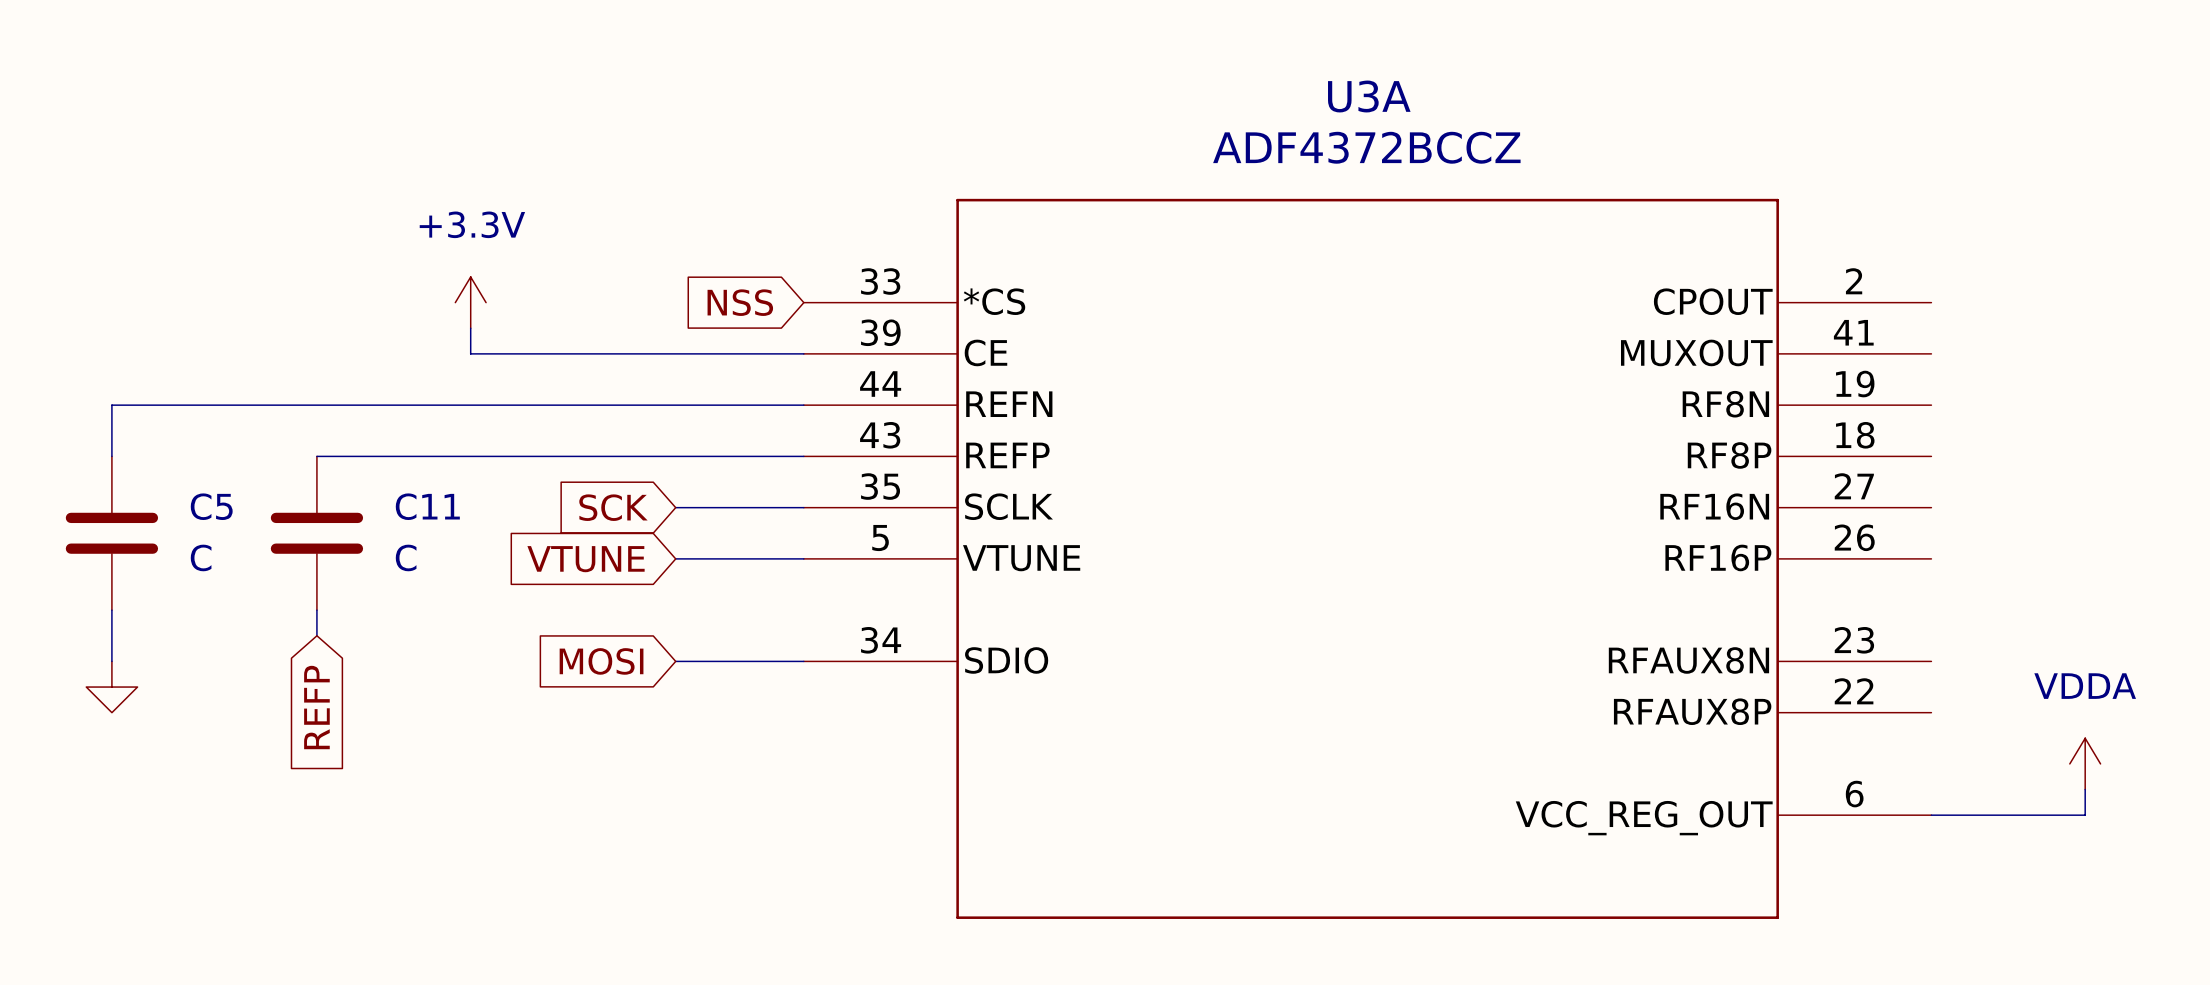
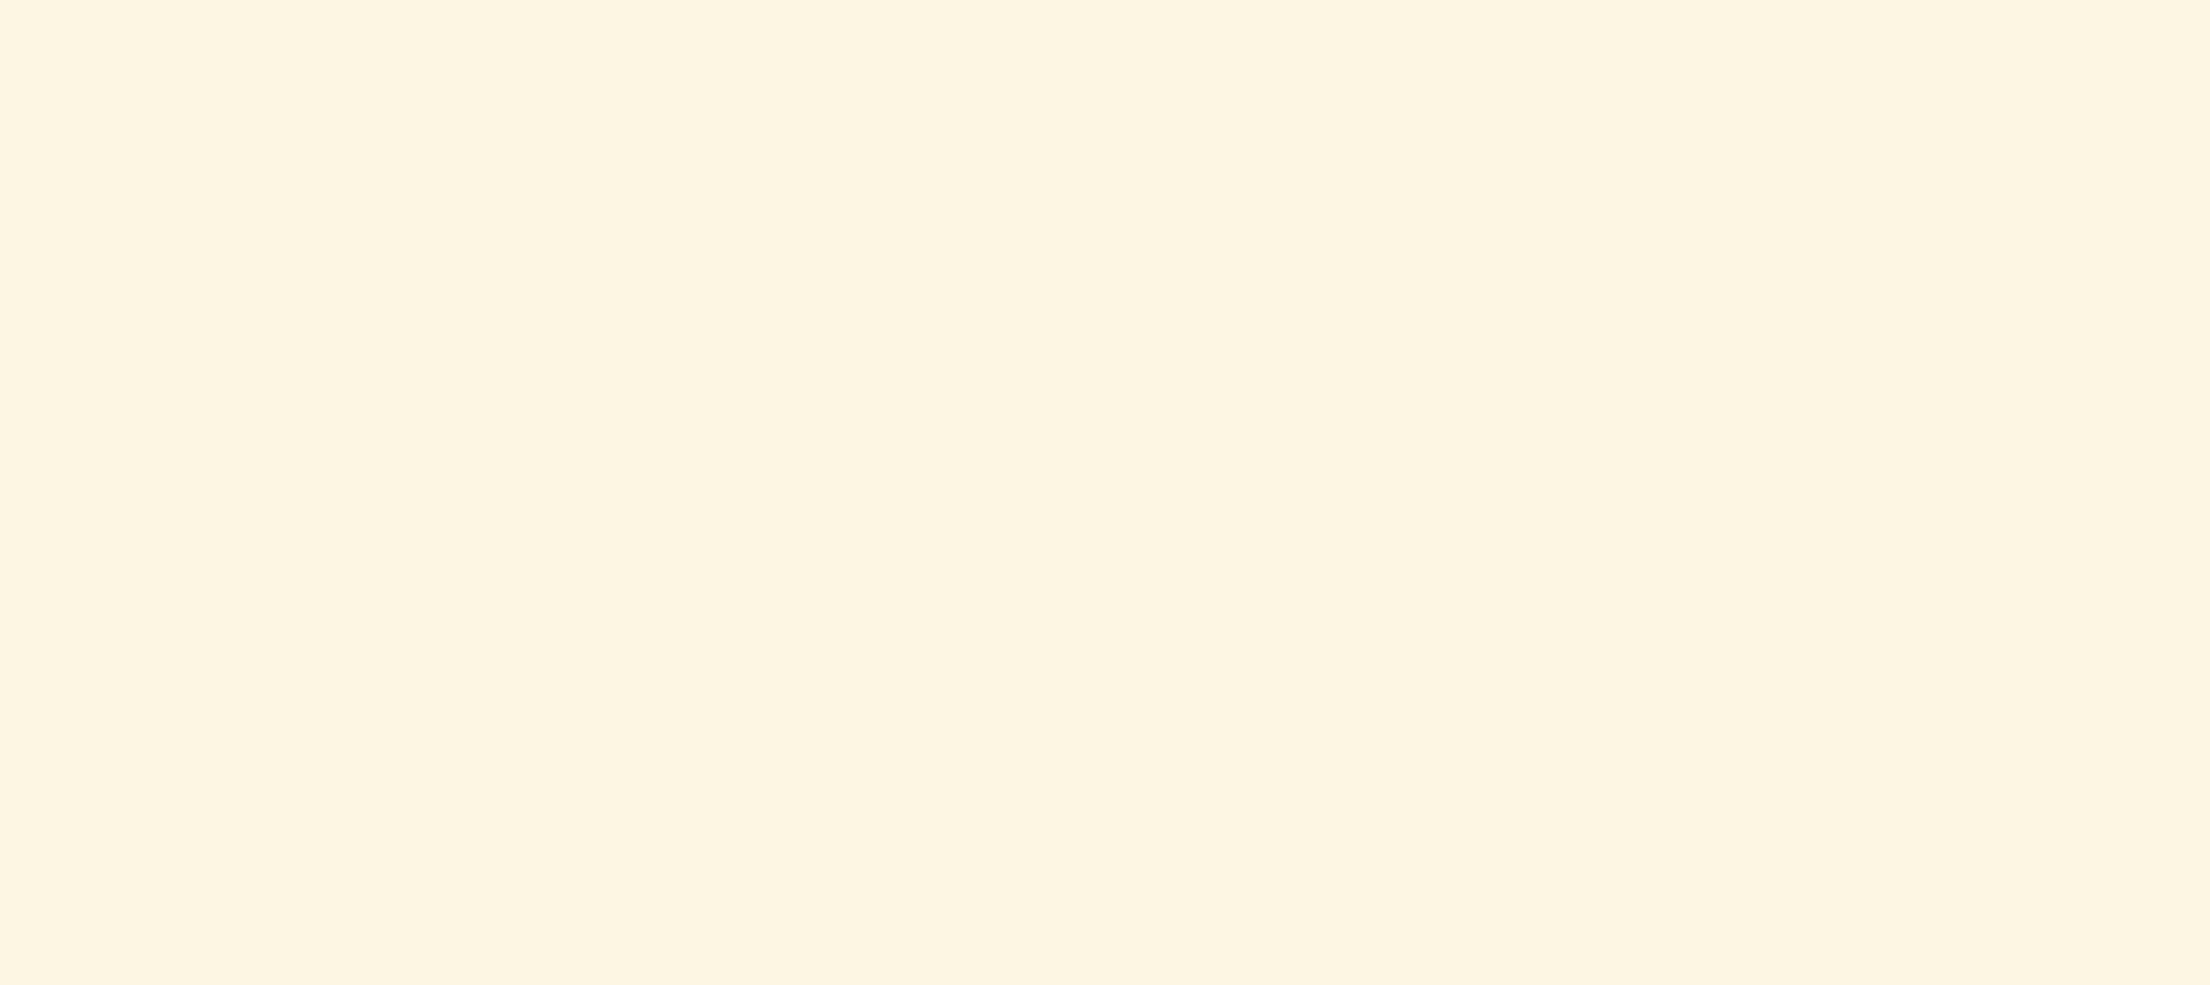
power symbol: +3.3V (470, 302) -> none
global label: NSS (740, 302) -> none
wire: (470, 328) (470, 353) (803, 353) -> none
wire: (803, 405) (111, 405) (111, 456) -> none
wire: (316, 456) (803, 456) -> none
global label: SCK (613, 507) -> none
wire: (675, 507) (803, 507) -> none
C5: C (111, 533) -> none
C11: C (316, 533) -> none
wire: (675, 558) (803, 558) -> none
U3A: ADF4372BCCZ (1367, 558) -> none
global label: VTUNE (586, 559) -> none
wire: (111, 610) (111, 661) -> none
wire: (316, 610) (316, 635) -> none
global label: MOSI (601, 661) -> none
wire: (675, 661) (803, 661) -> none
power symbol: (111, 687) -> none
global label: REFP (316, 707) -> none
power symbol: VDDA (2085, 763) -> none
wire: (2085, 789) (2085, 815) (1931, 815) -> none

